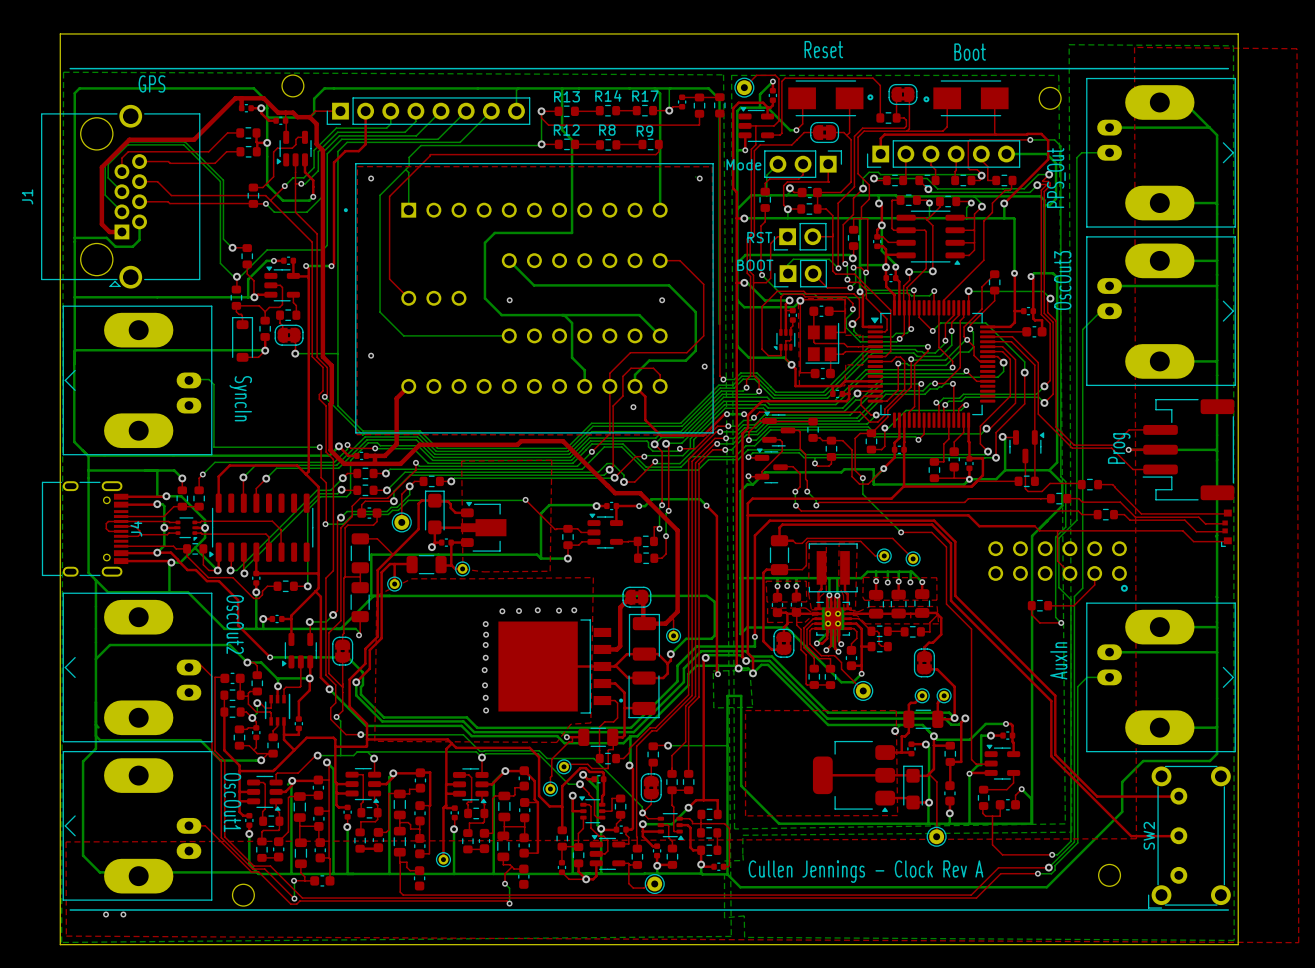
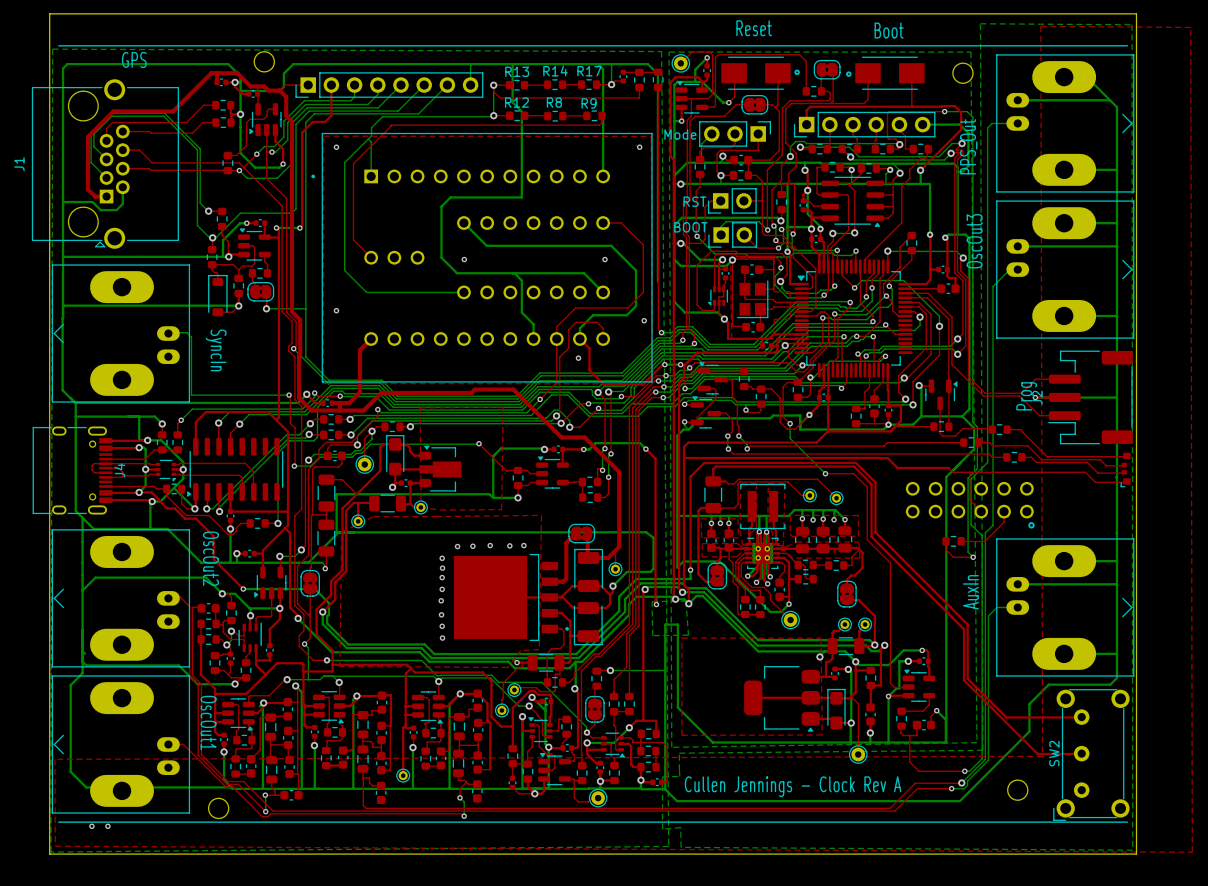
J2 name: none -> J2 (1037, 397)

